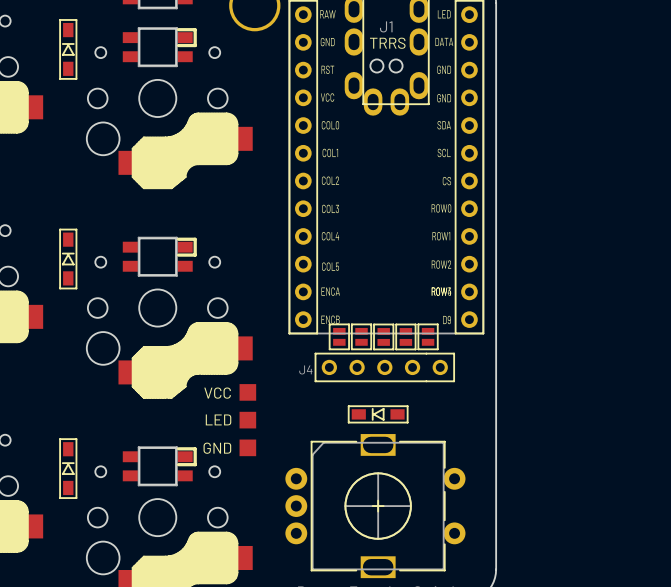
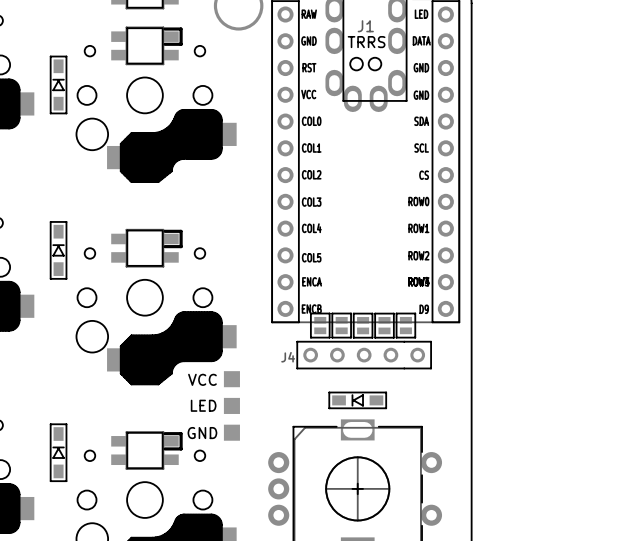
part position: (68, 49) -> (58, 84)

